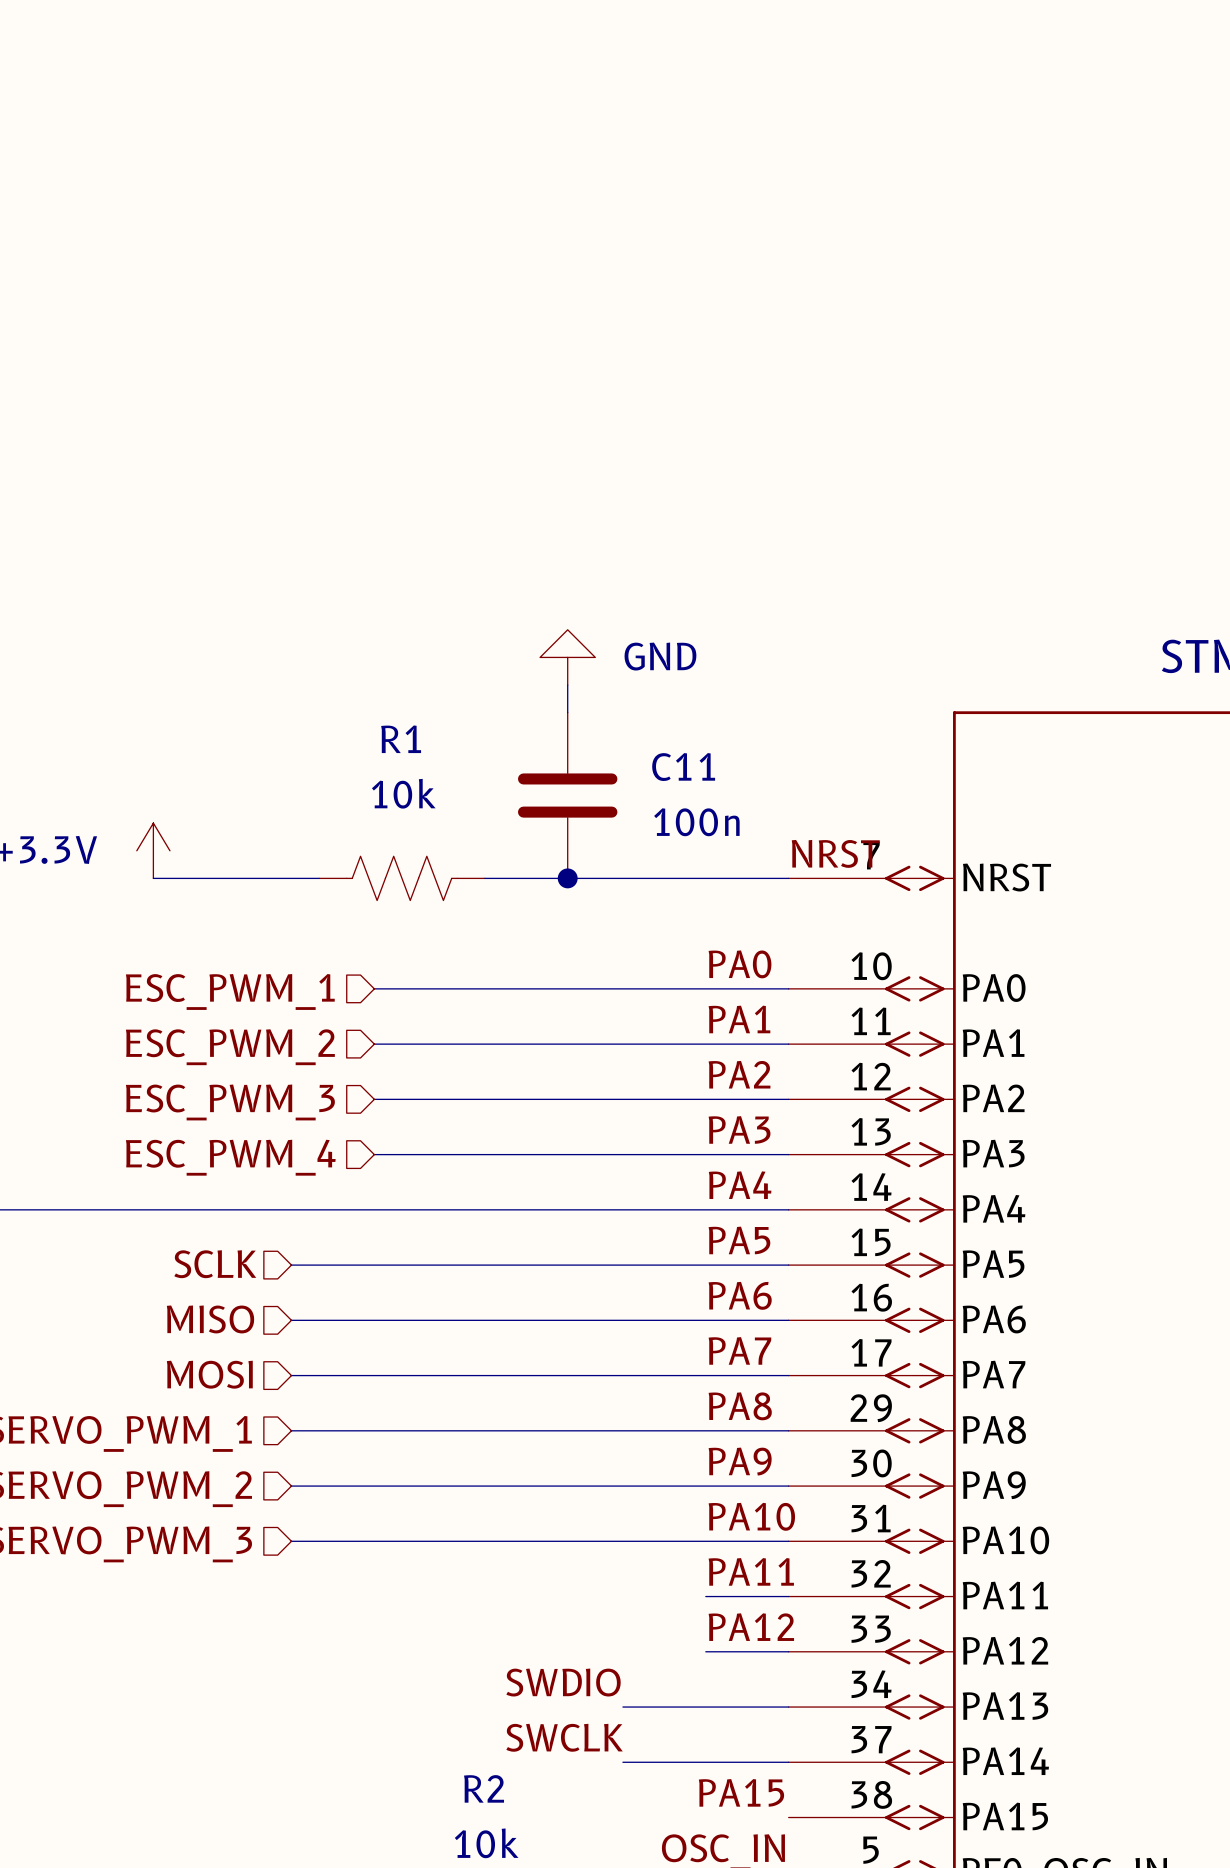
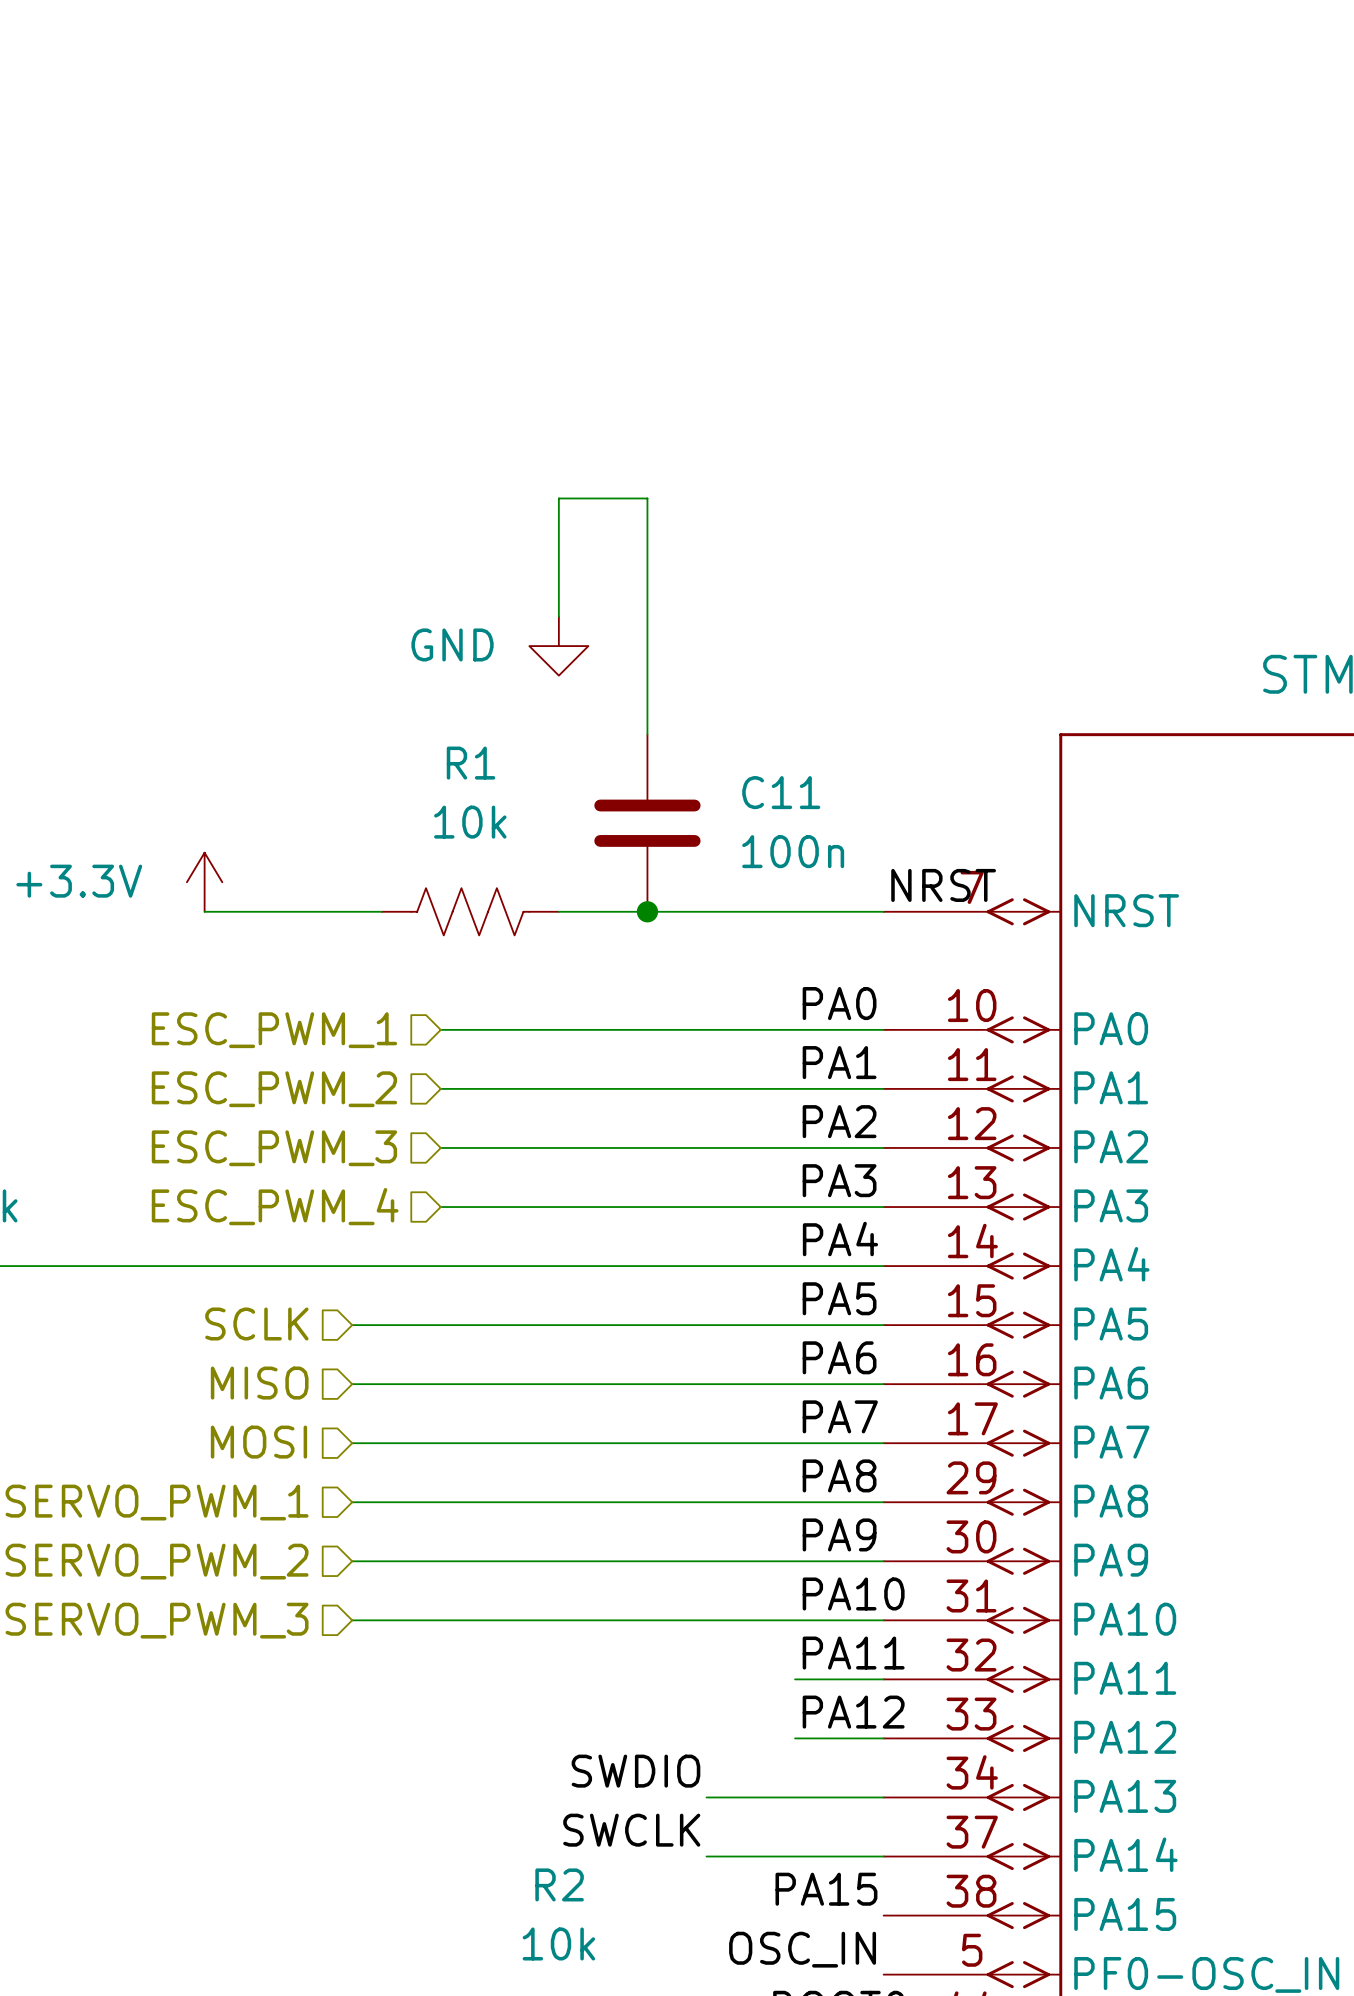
wire: none -> (558, 616) (558, 498) (647, 498) (647, 705)
power symbol rotation: 0° (567, 657) -> 180° (558, 646)
power symbol position: GND (567, 657) -> GND (558, 646)

